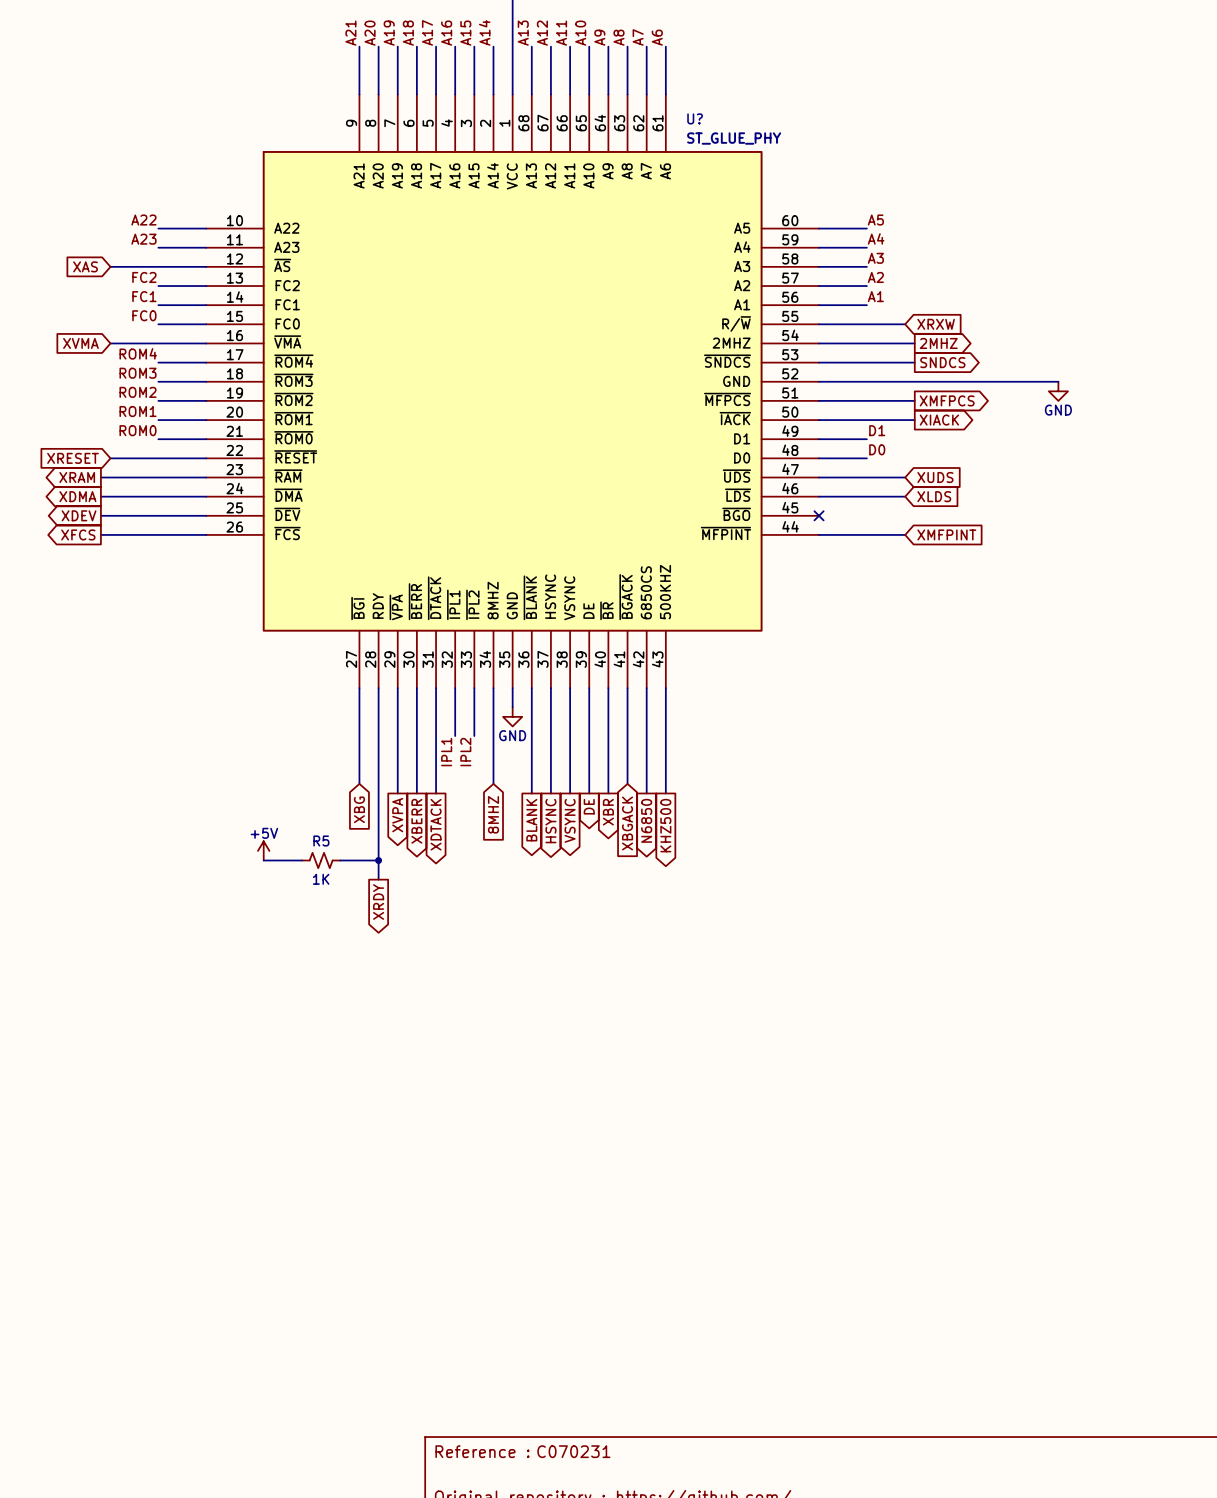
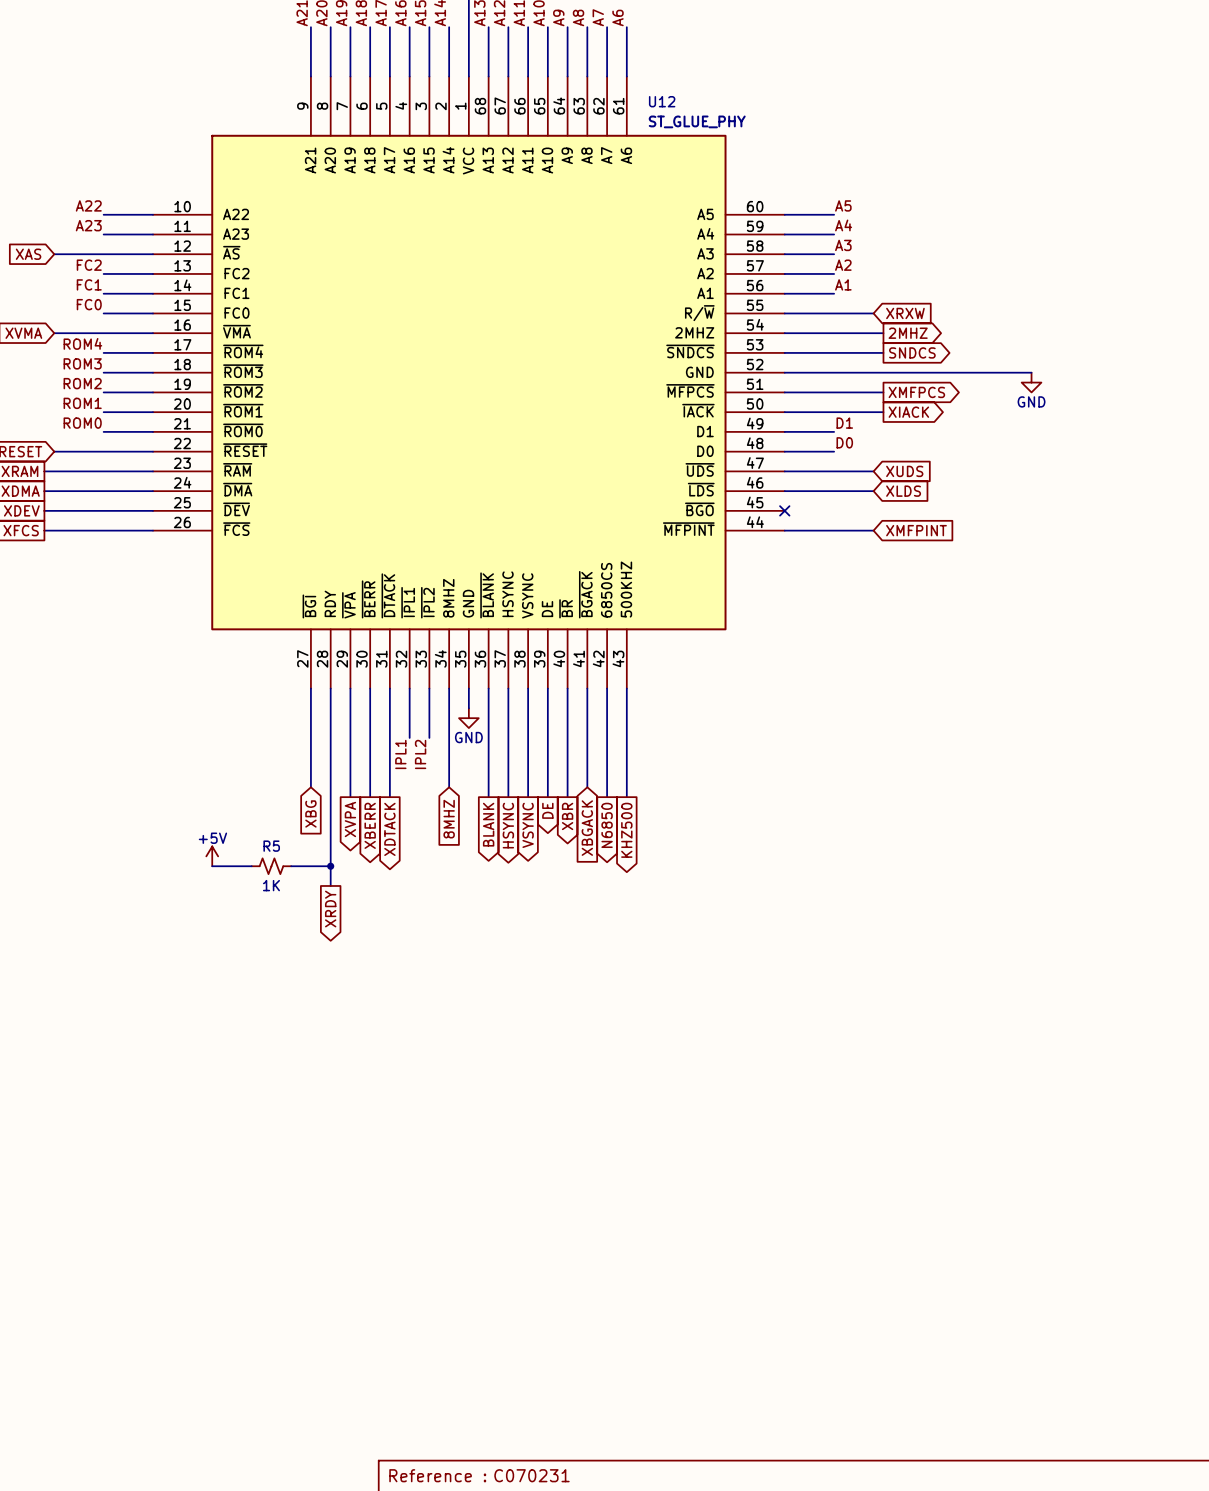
U? name: U? (695, 118) -> U12 (662, 101)

